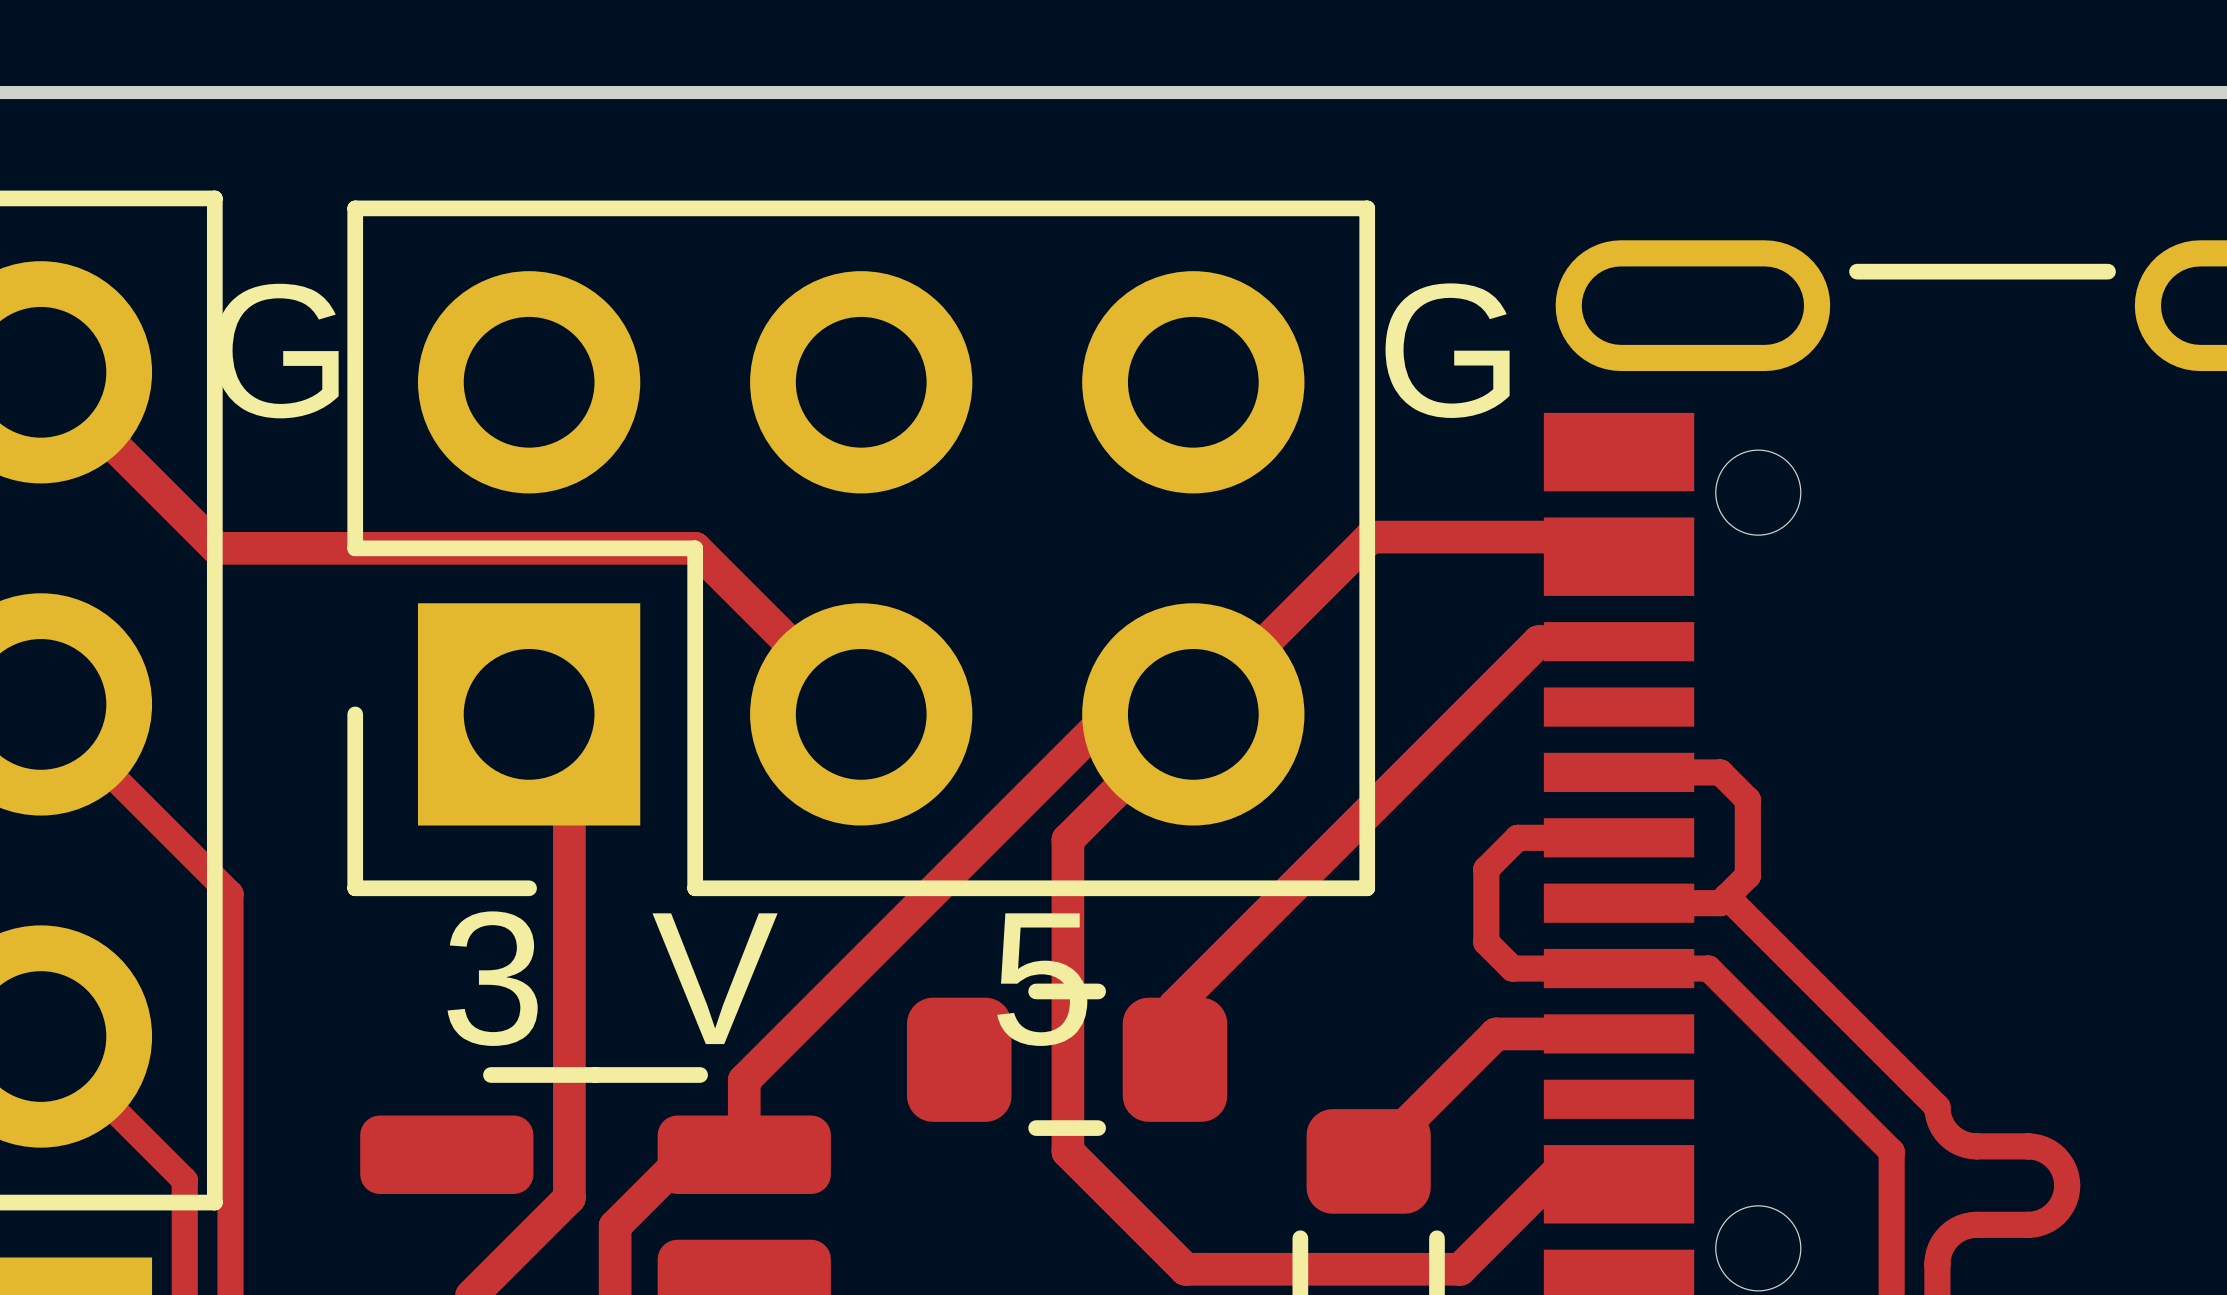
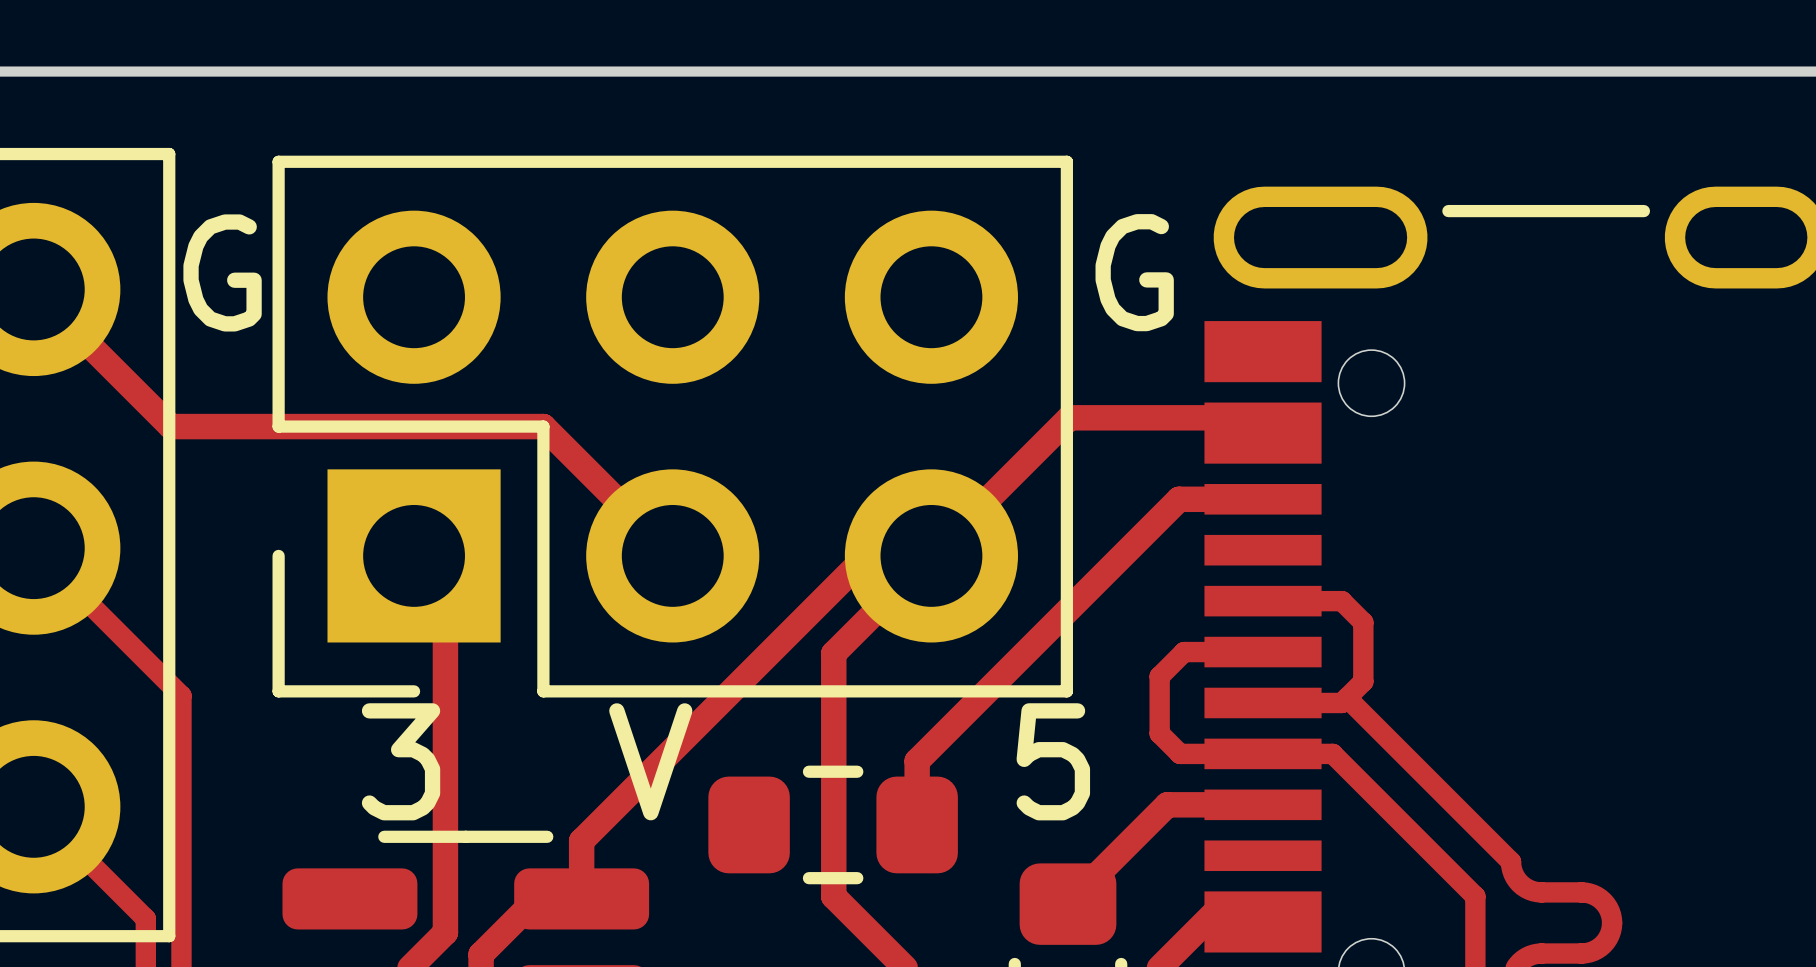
top track: (1538, 641) (1174, 1005) -> (1200, 499) (1179, 499) (917, 761) (917, 782)

